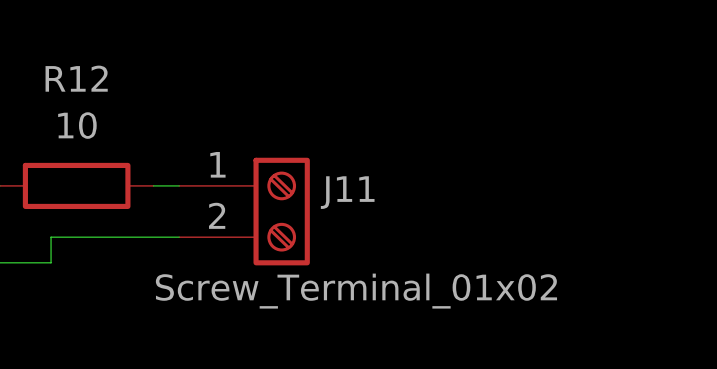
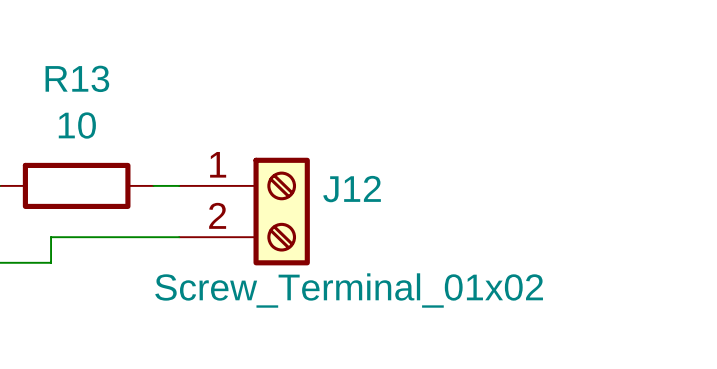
R12 name: R12 (76, 78) -> R13 (77, 78)
J11 name: J11 (347, 192) -> J12 (352, 189)

